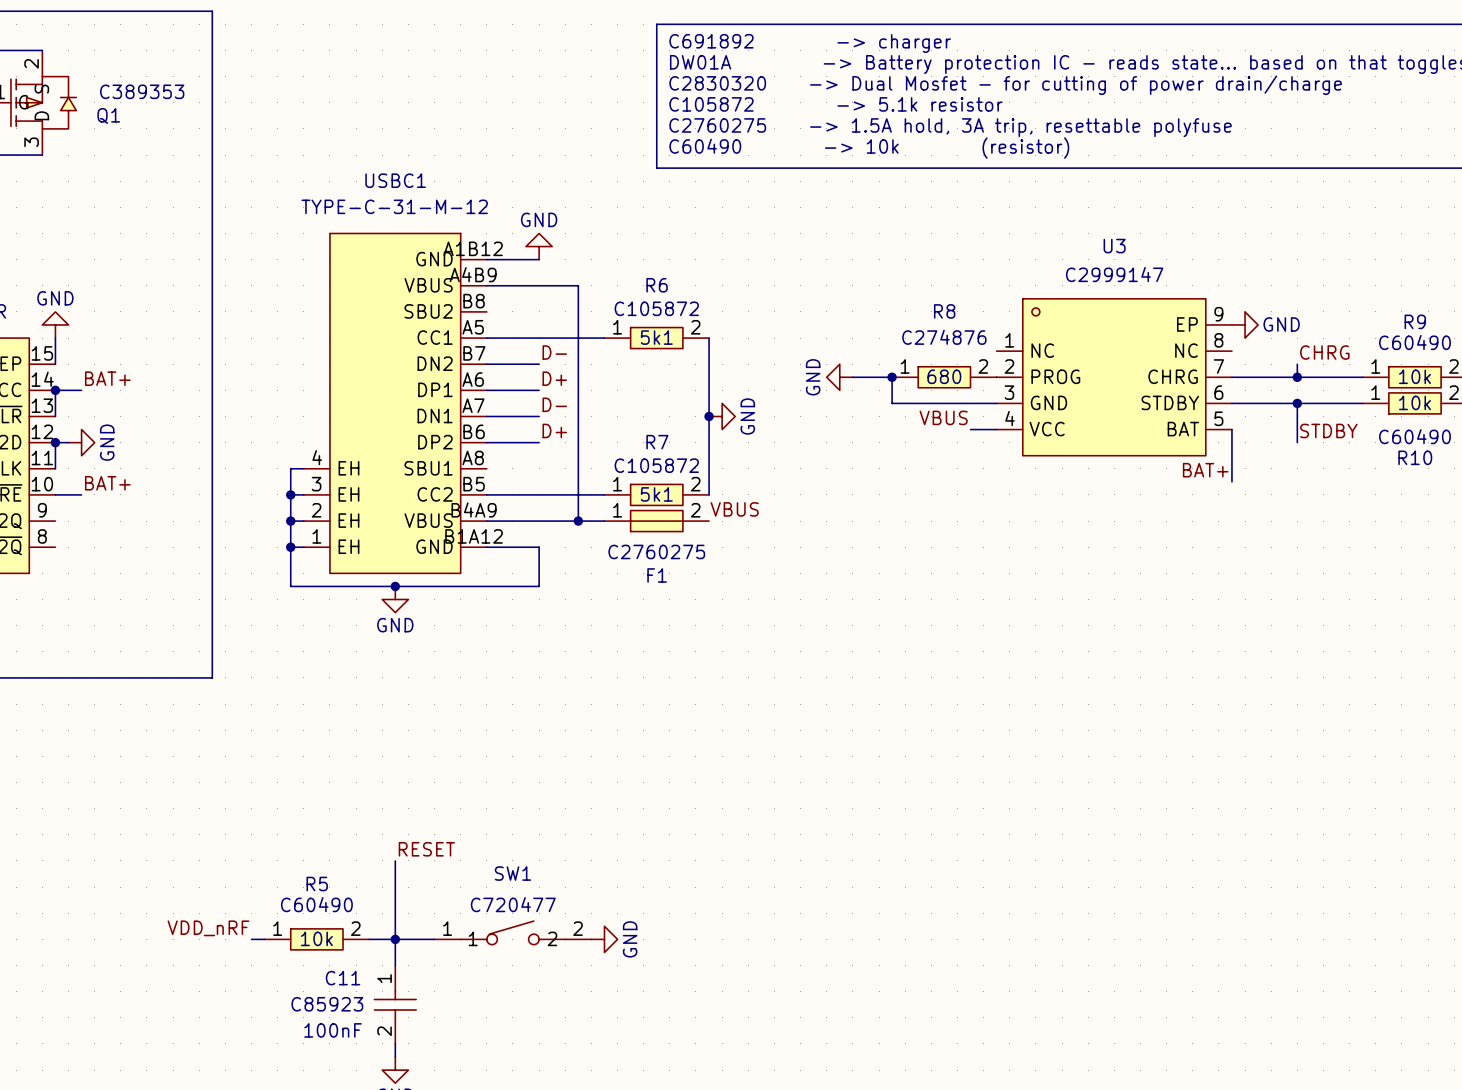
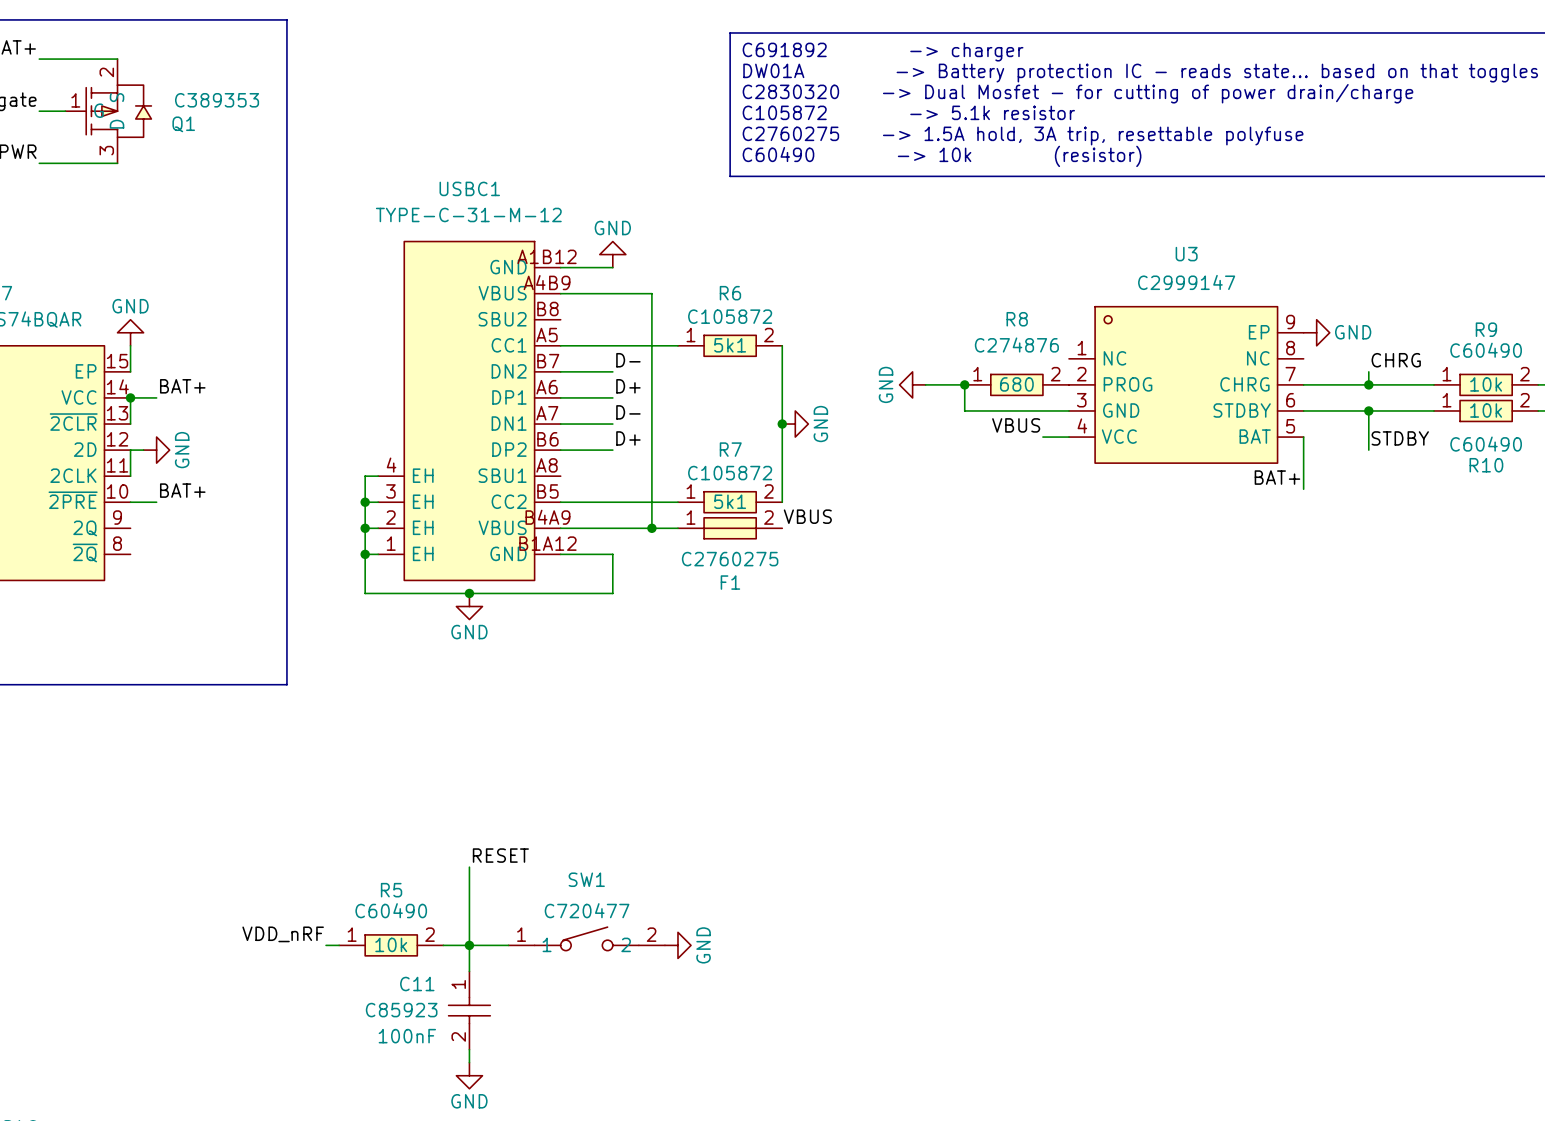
junction: (55, 442) -> none

